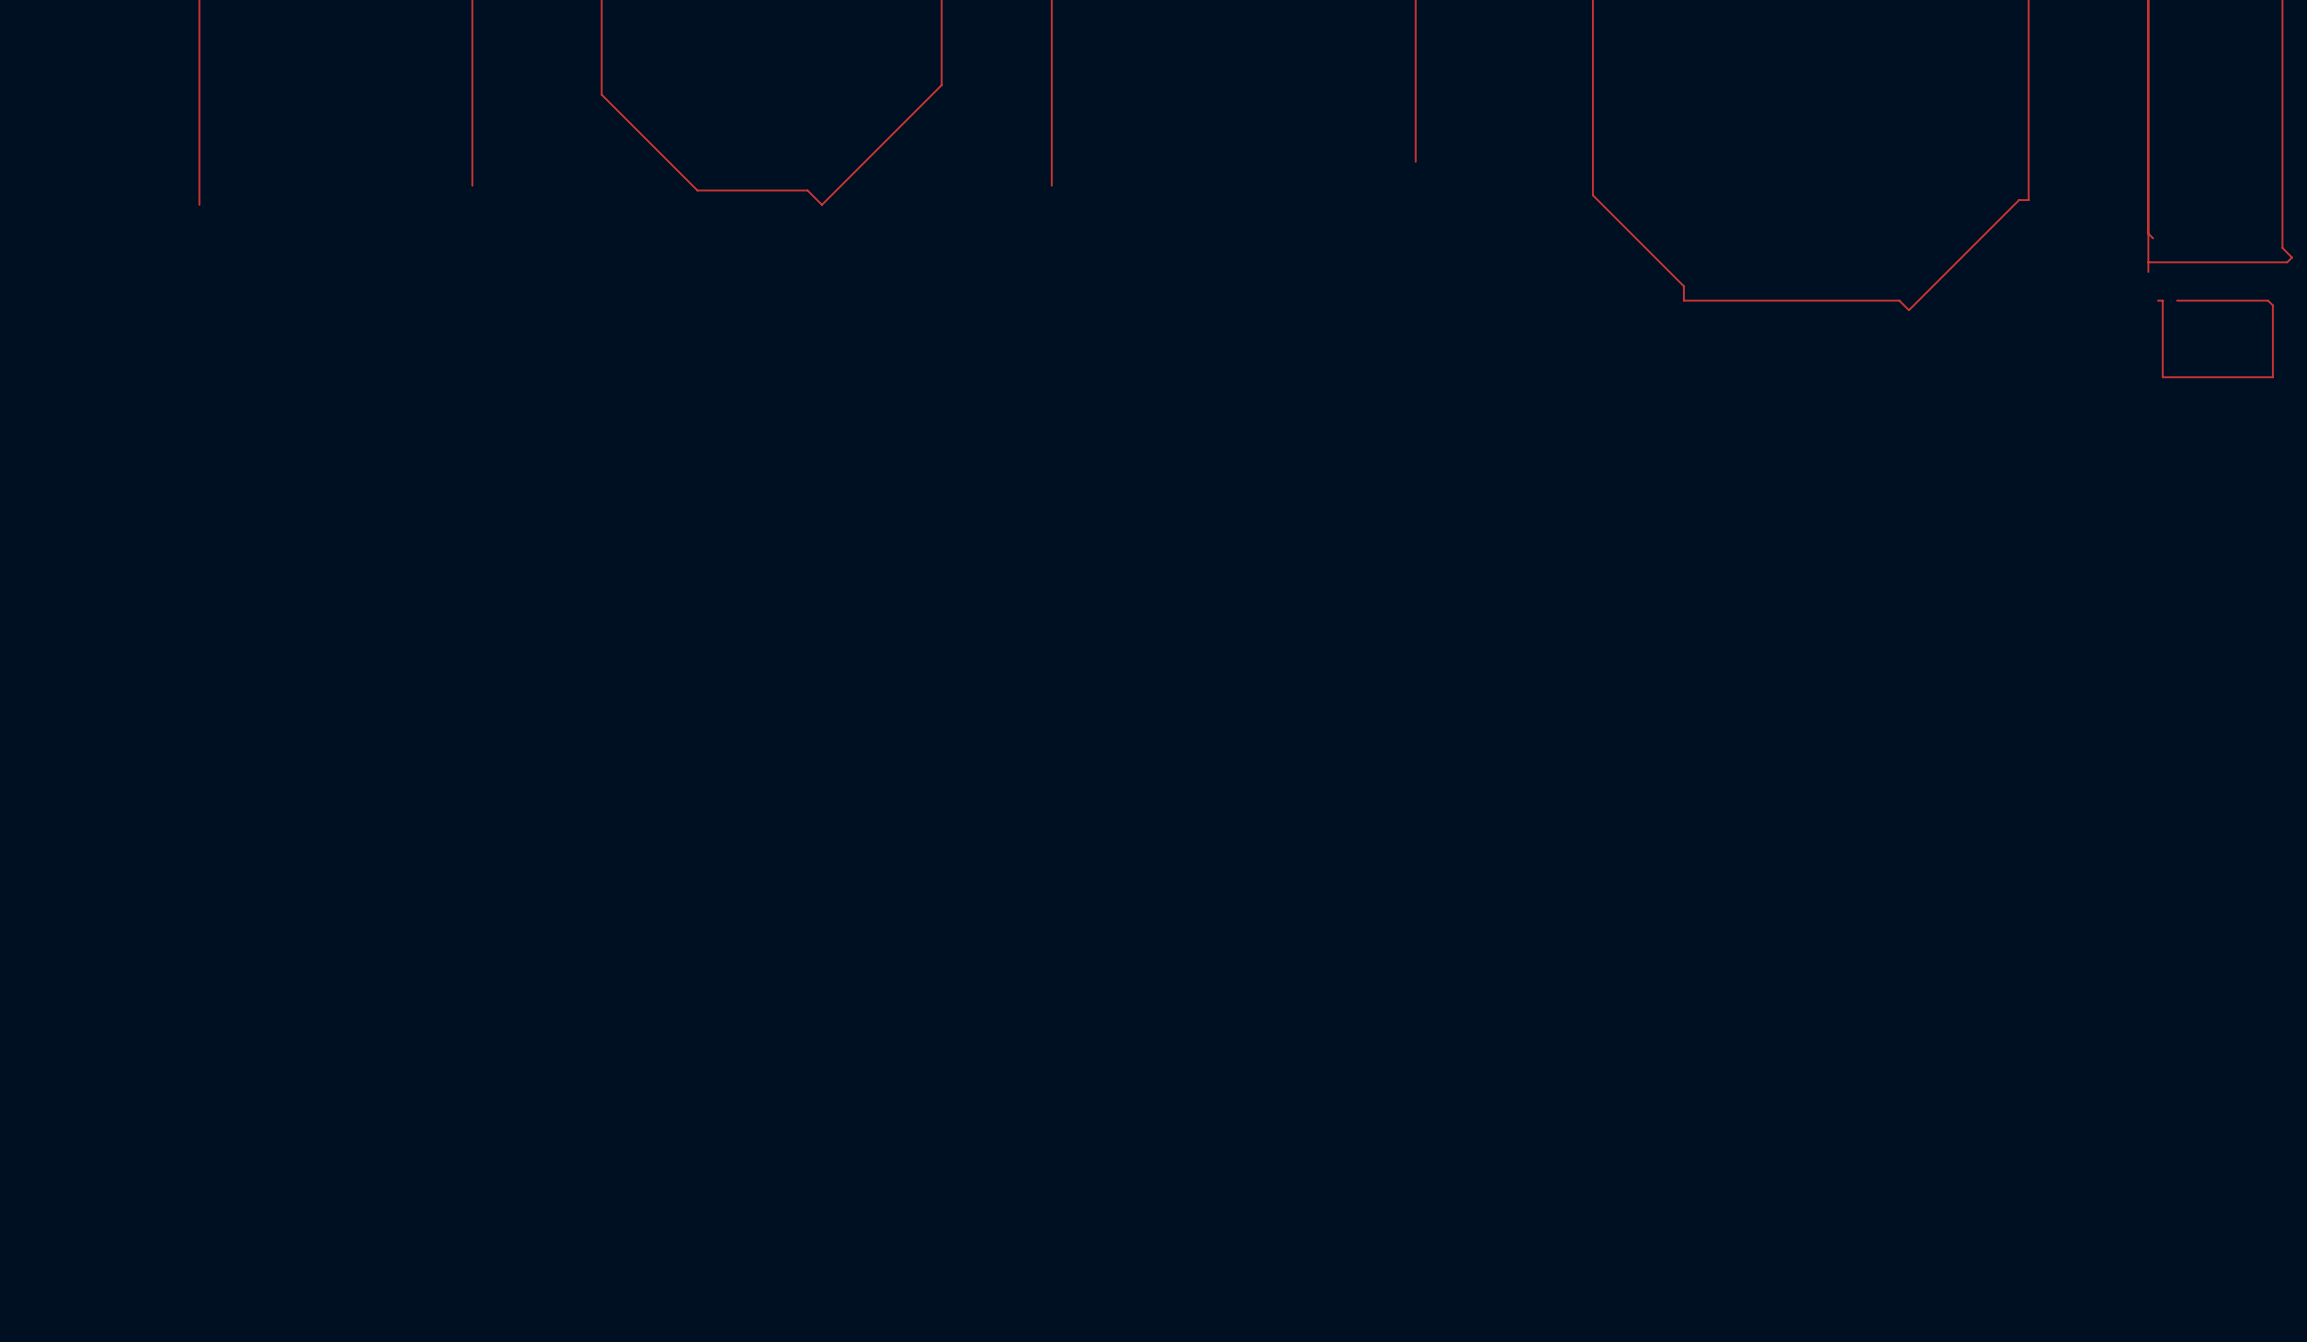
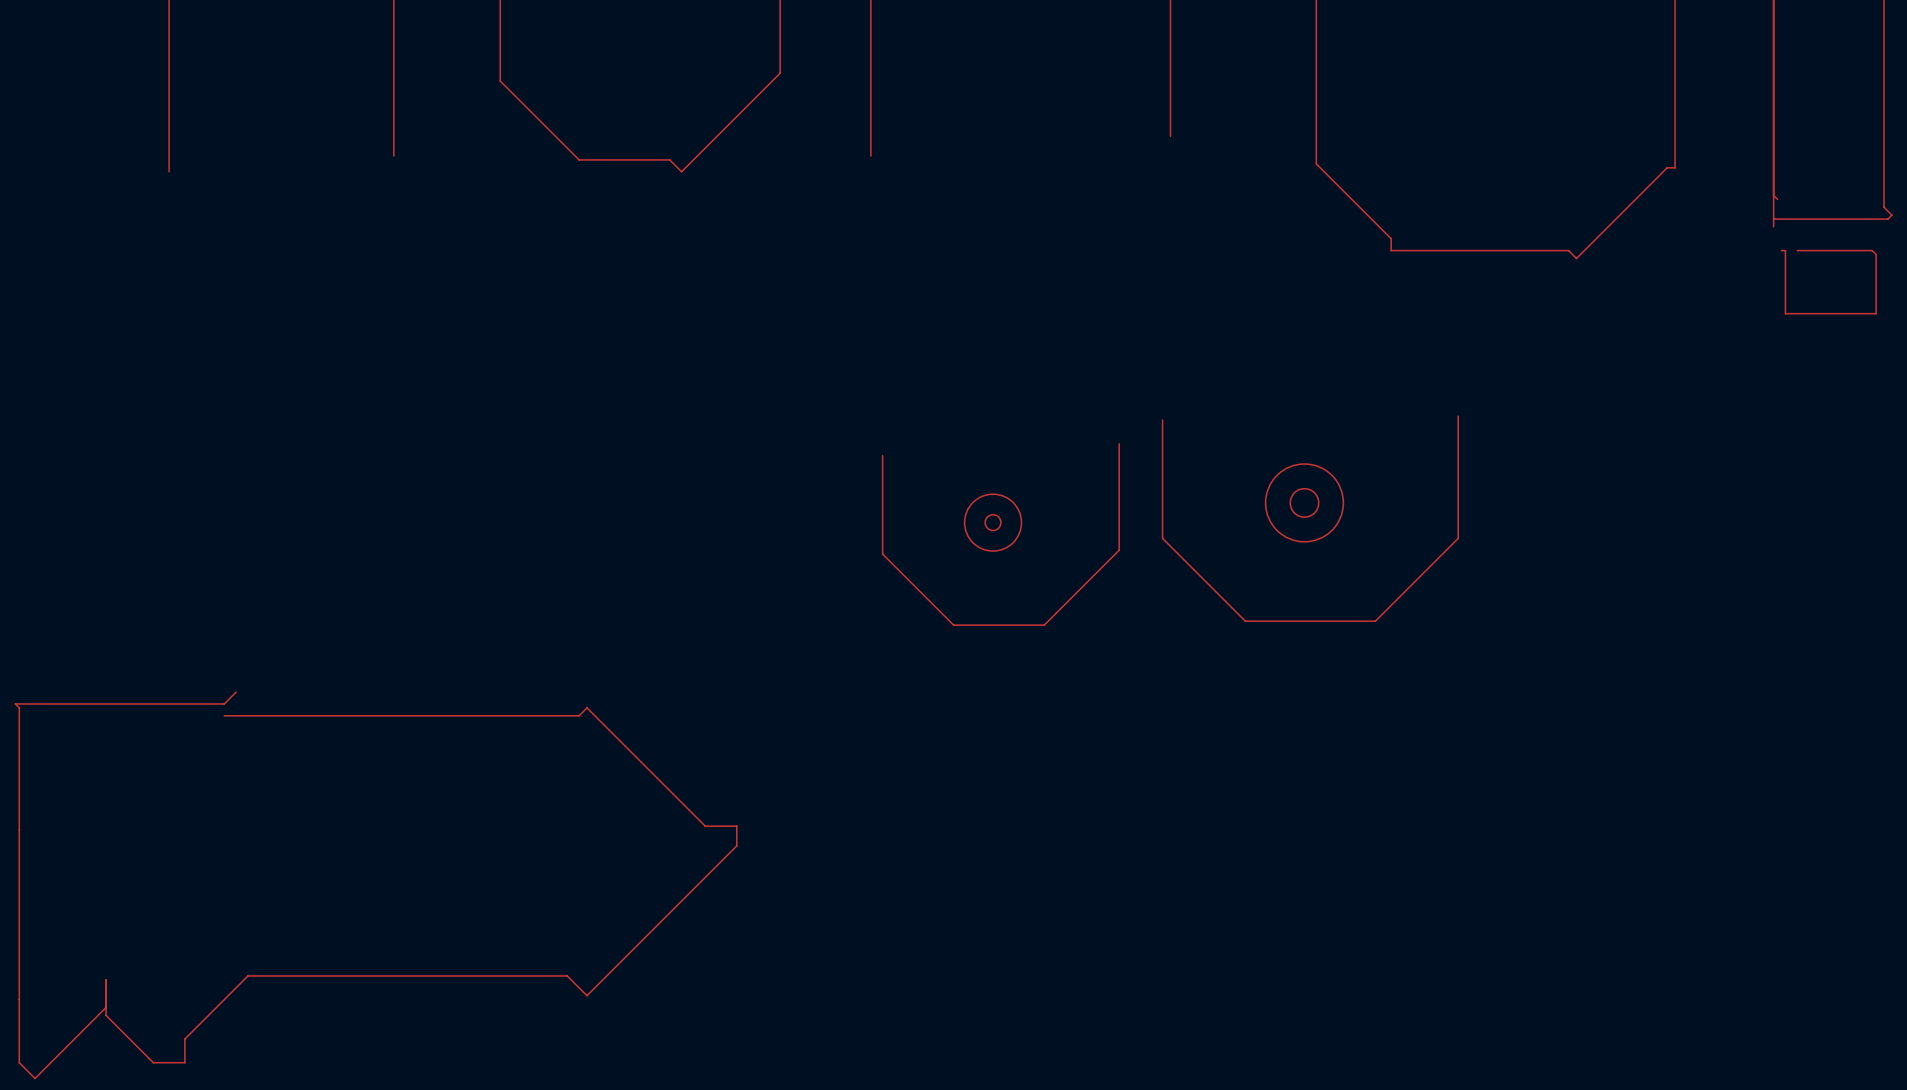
track: none -> (1458, 416) (1458, 538) (1375, 621) (1245, 621) (1162, 538) (1162, 420)
track: none -> (1119, 443) (1119, 550) (1044, 625) (953, 625) (882, 554) (882, 455)
drawing: none -> [1264, 463, 1345, 543]
drawing: none -> [963, 493, 1023, 552]
track: none -> (236, 692) (224, 703) (15, 703) (19, 707) (19, 1062) (35, 1078) (106, 1007)
track: none -> (224, 715) (579, 715) (586, 707) (705, 826) (736, 826) (736, 845) (586, 995) (567, 975) (247, 975) (184, 1039) (184, 1062) (153, 1062) (106, 1015) (106, 979)

